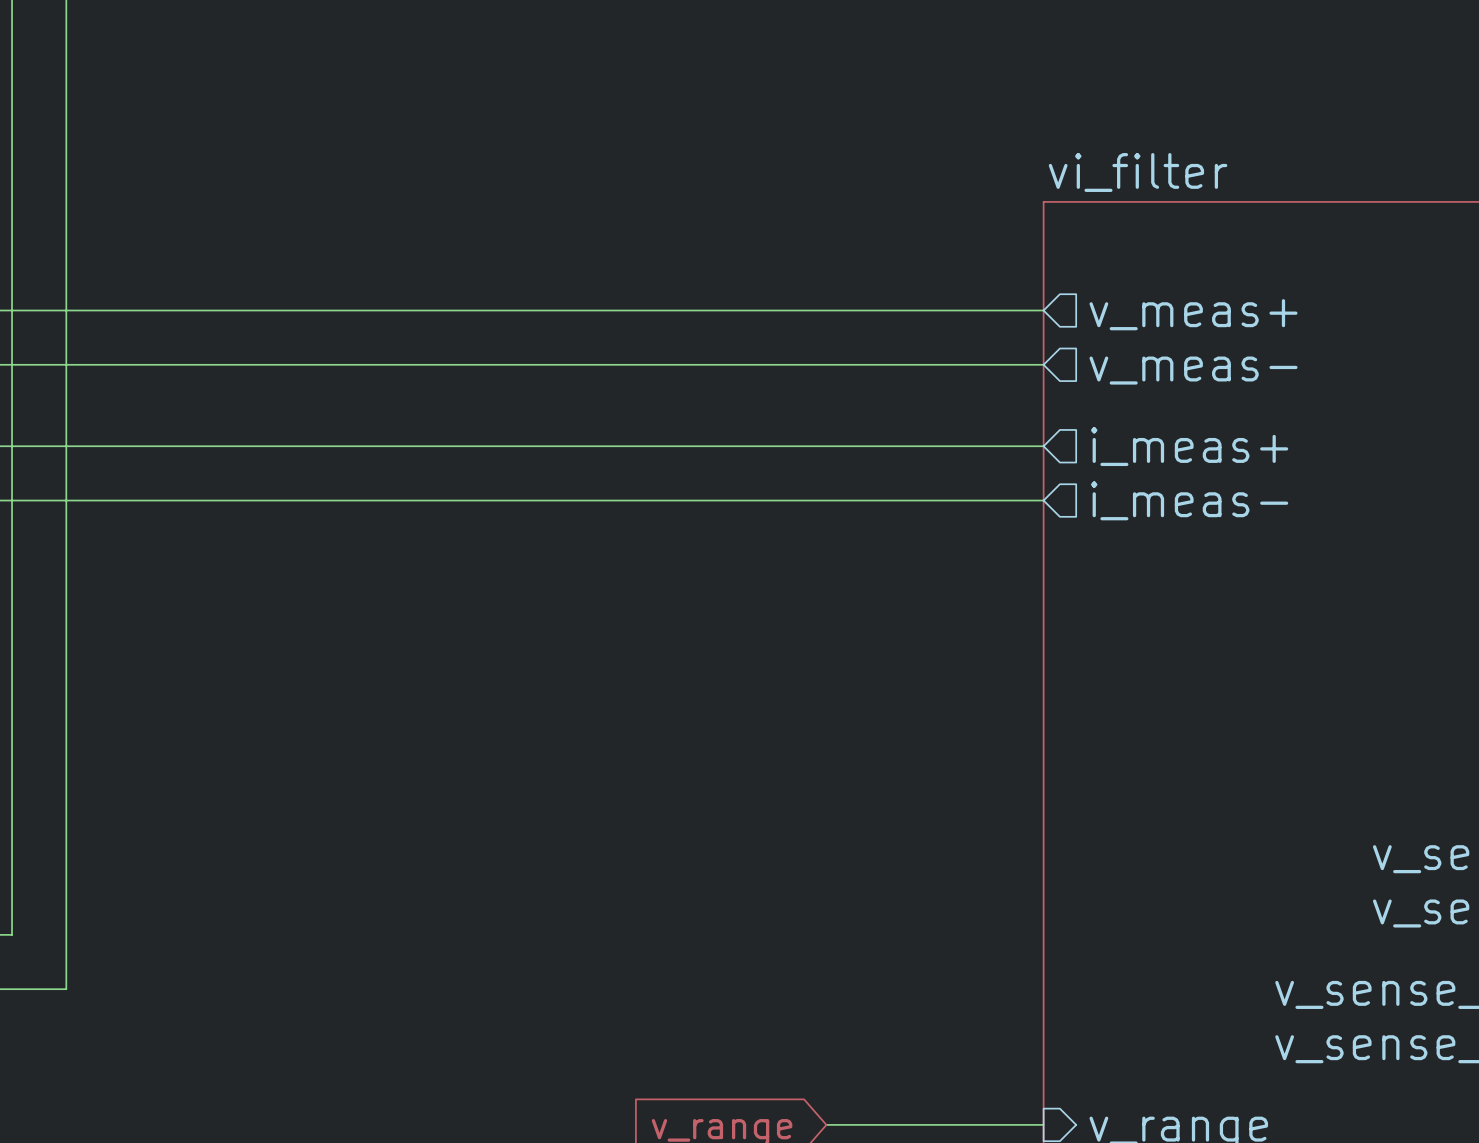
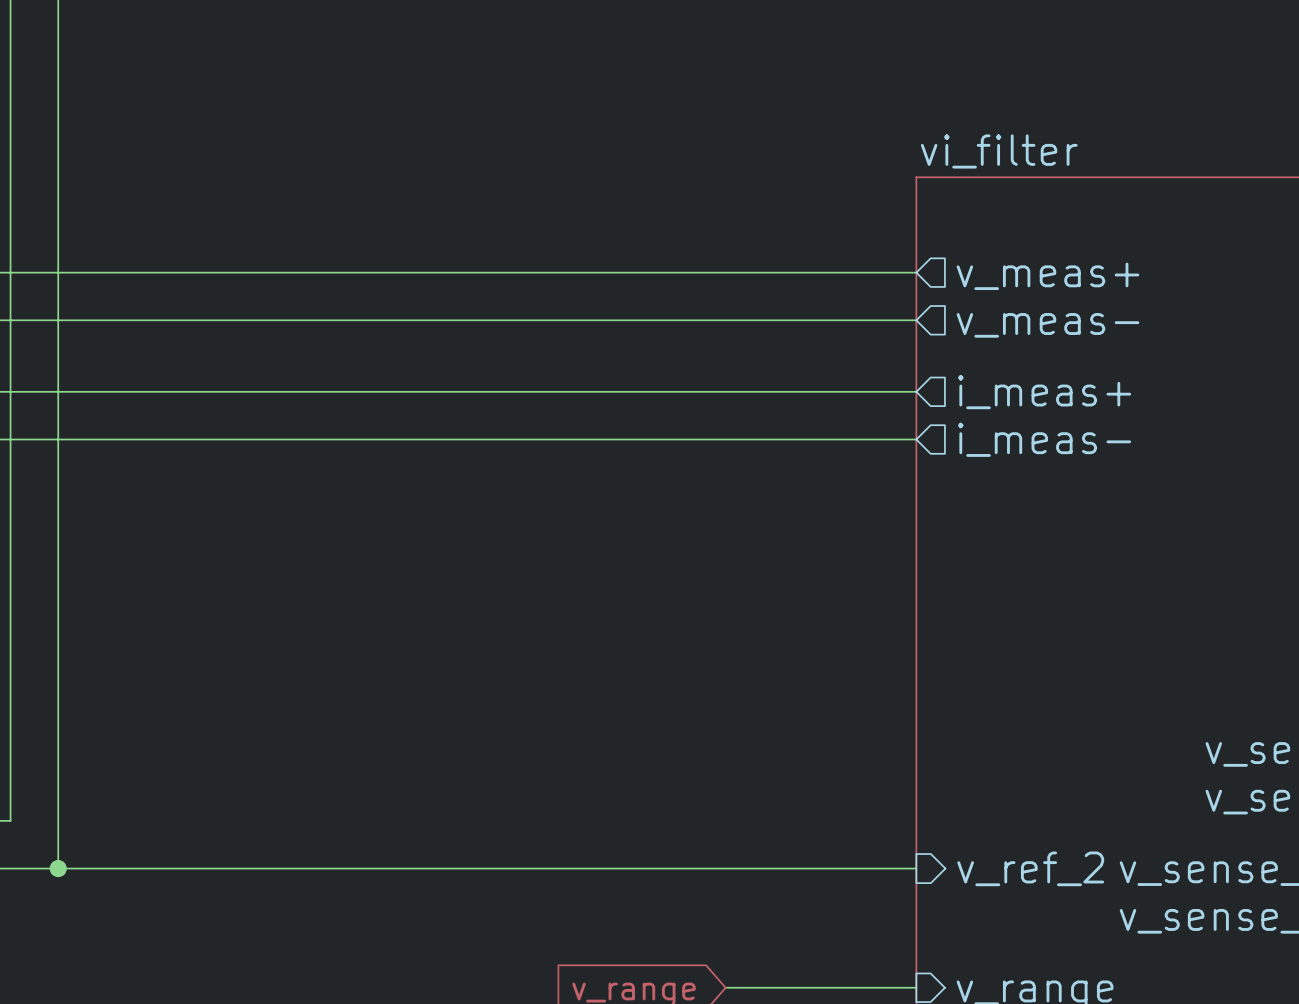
wire: none -> (58, 868) (916, 868)
junction: none -> (58, 868)
sheet pin: none -> v_ref_2 (1030, 868)

